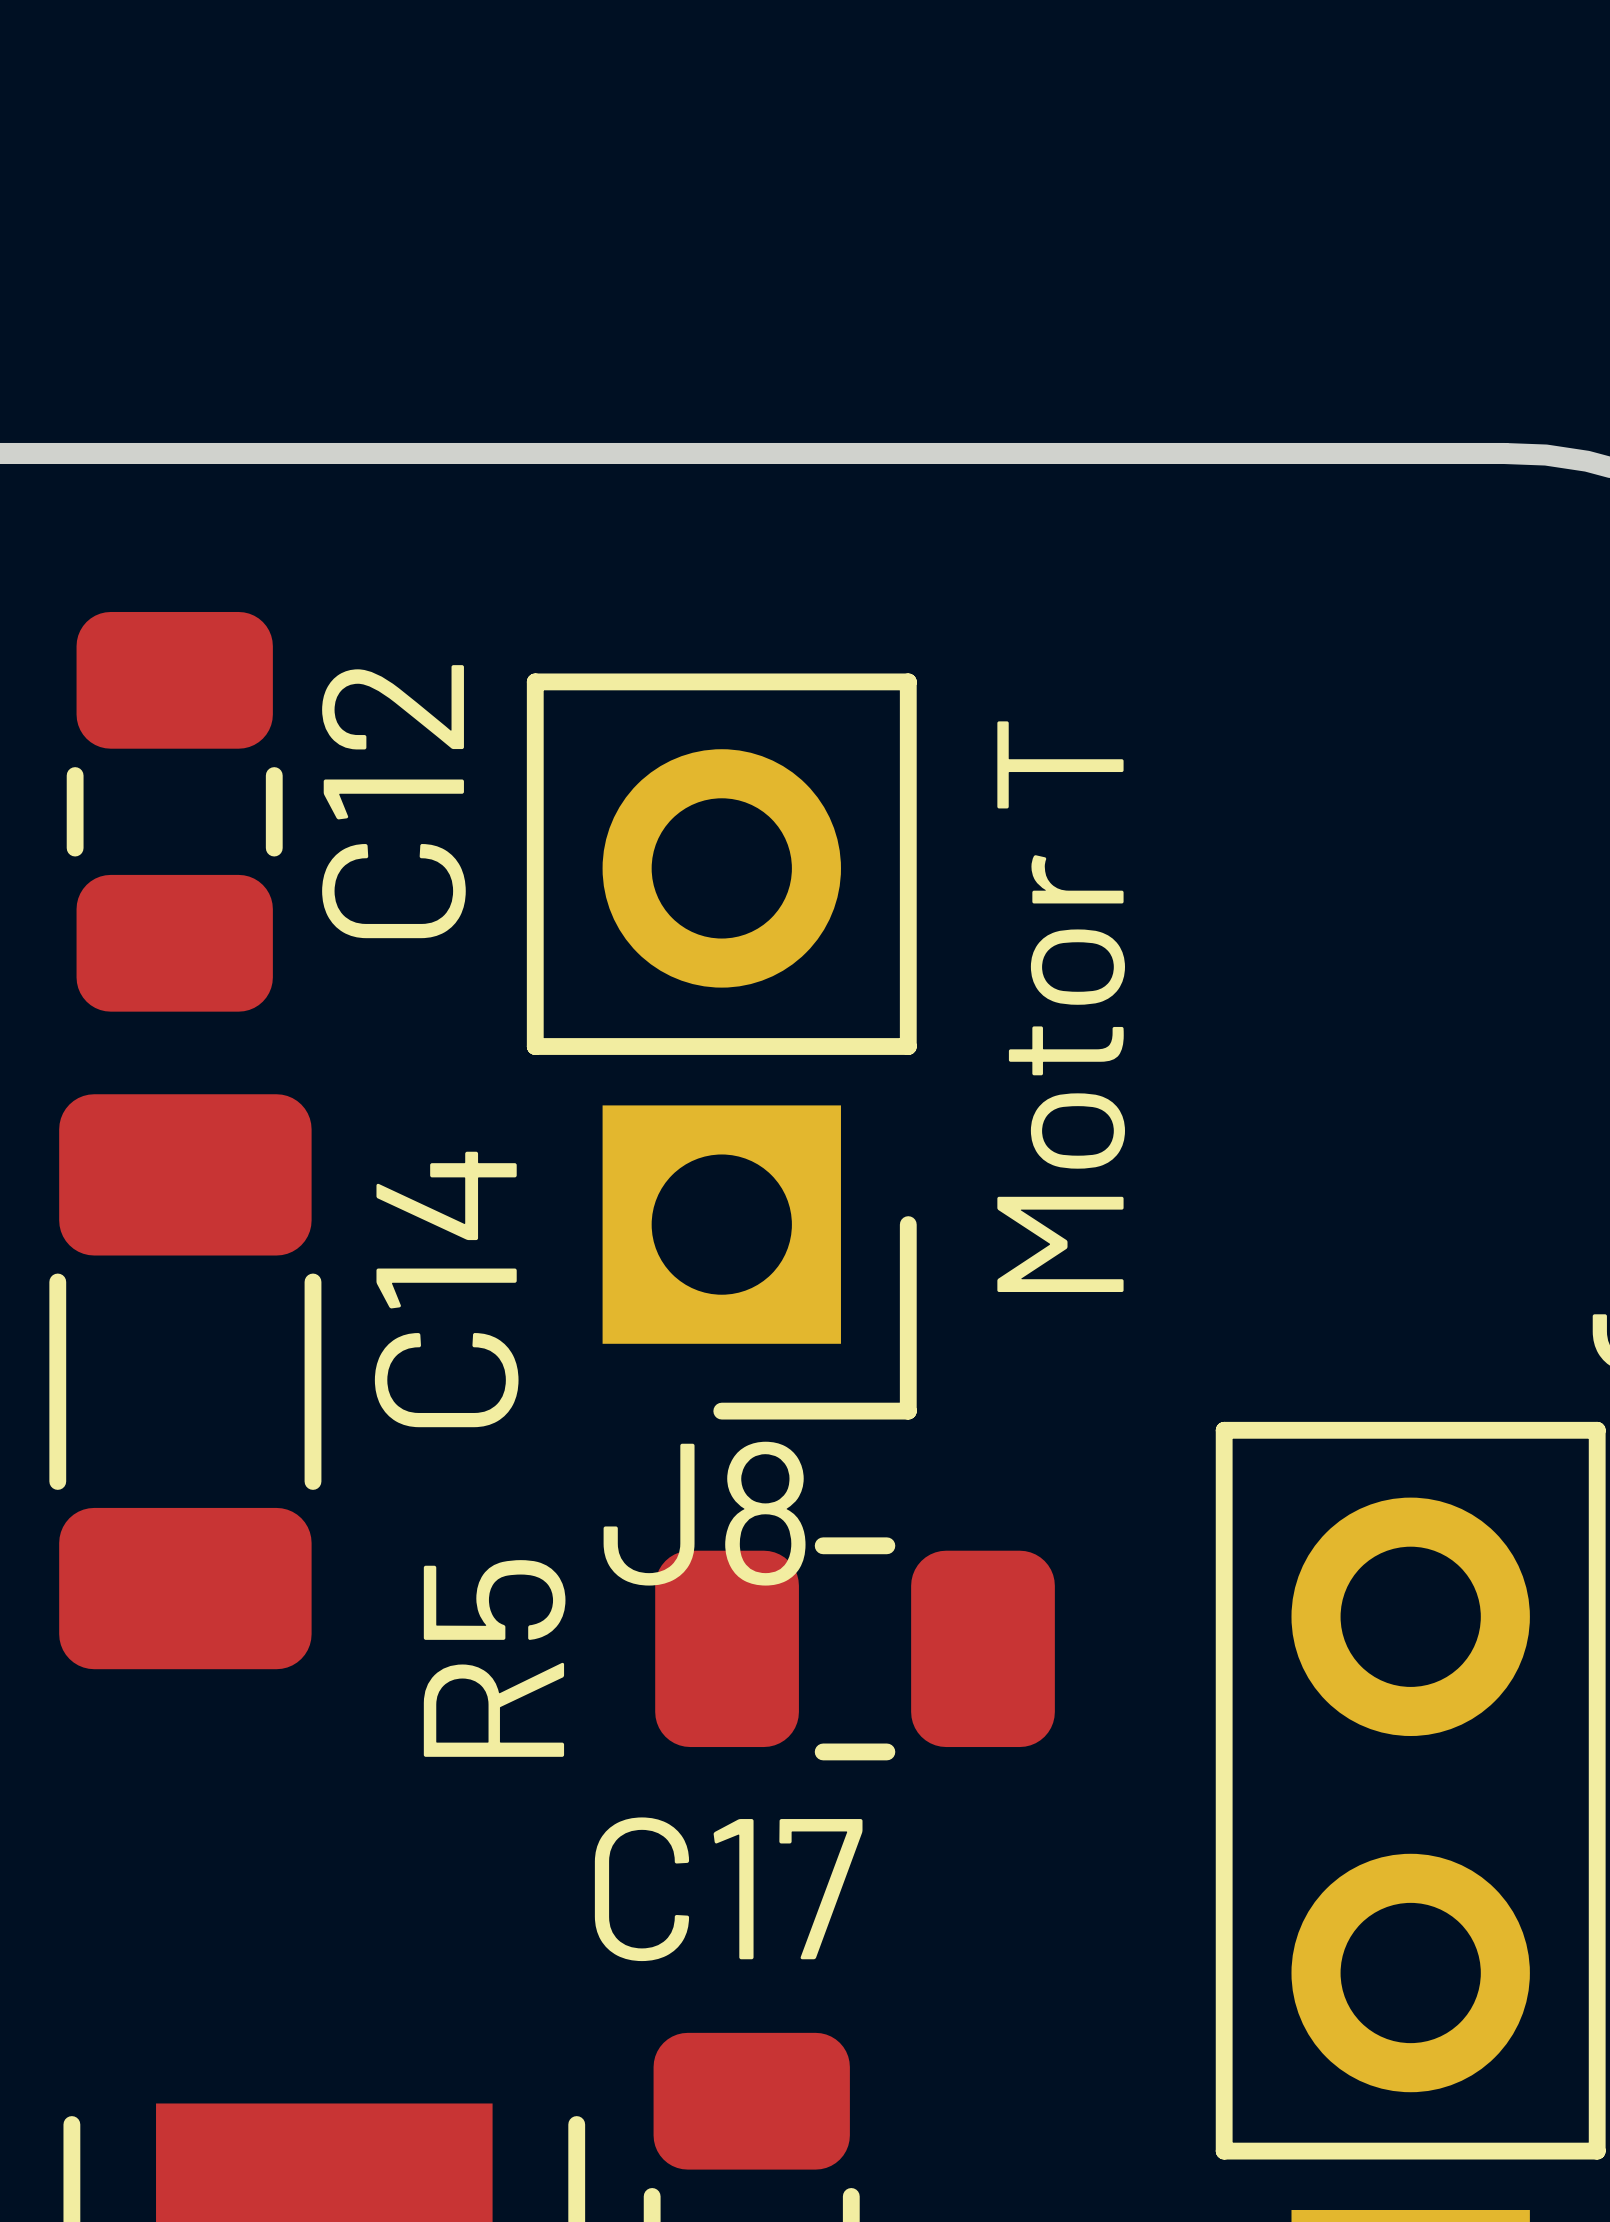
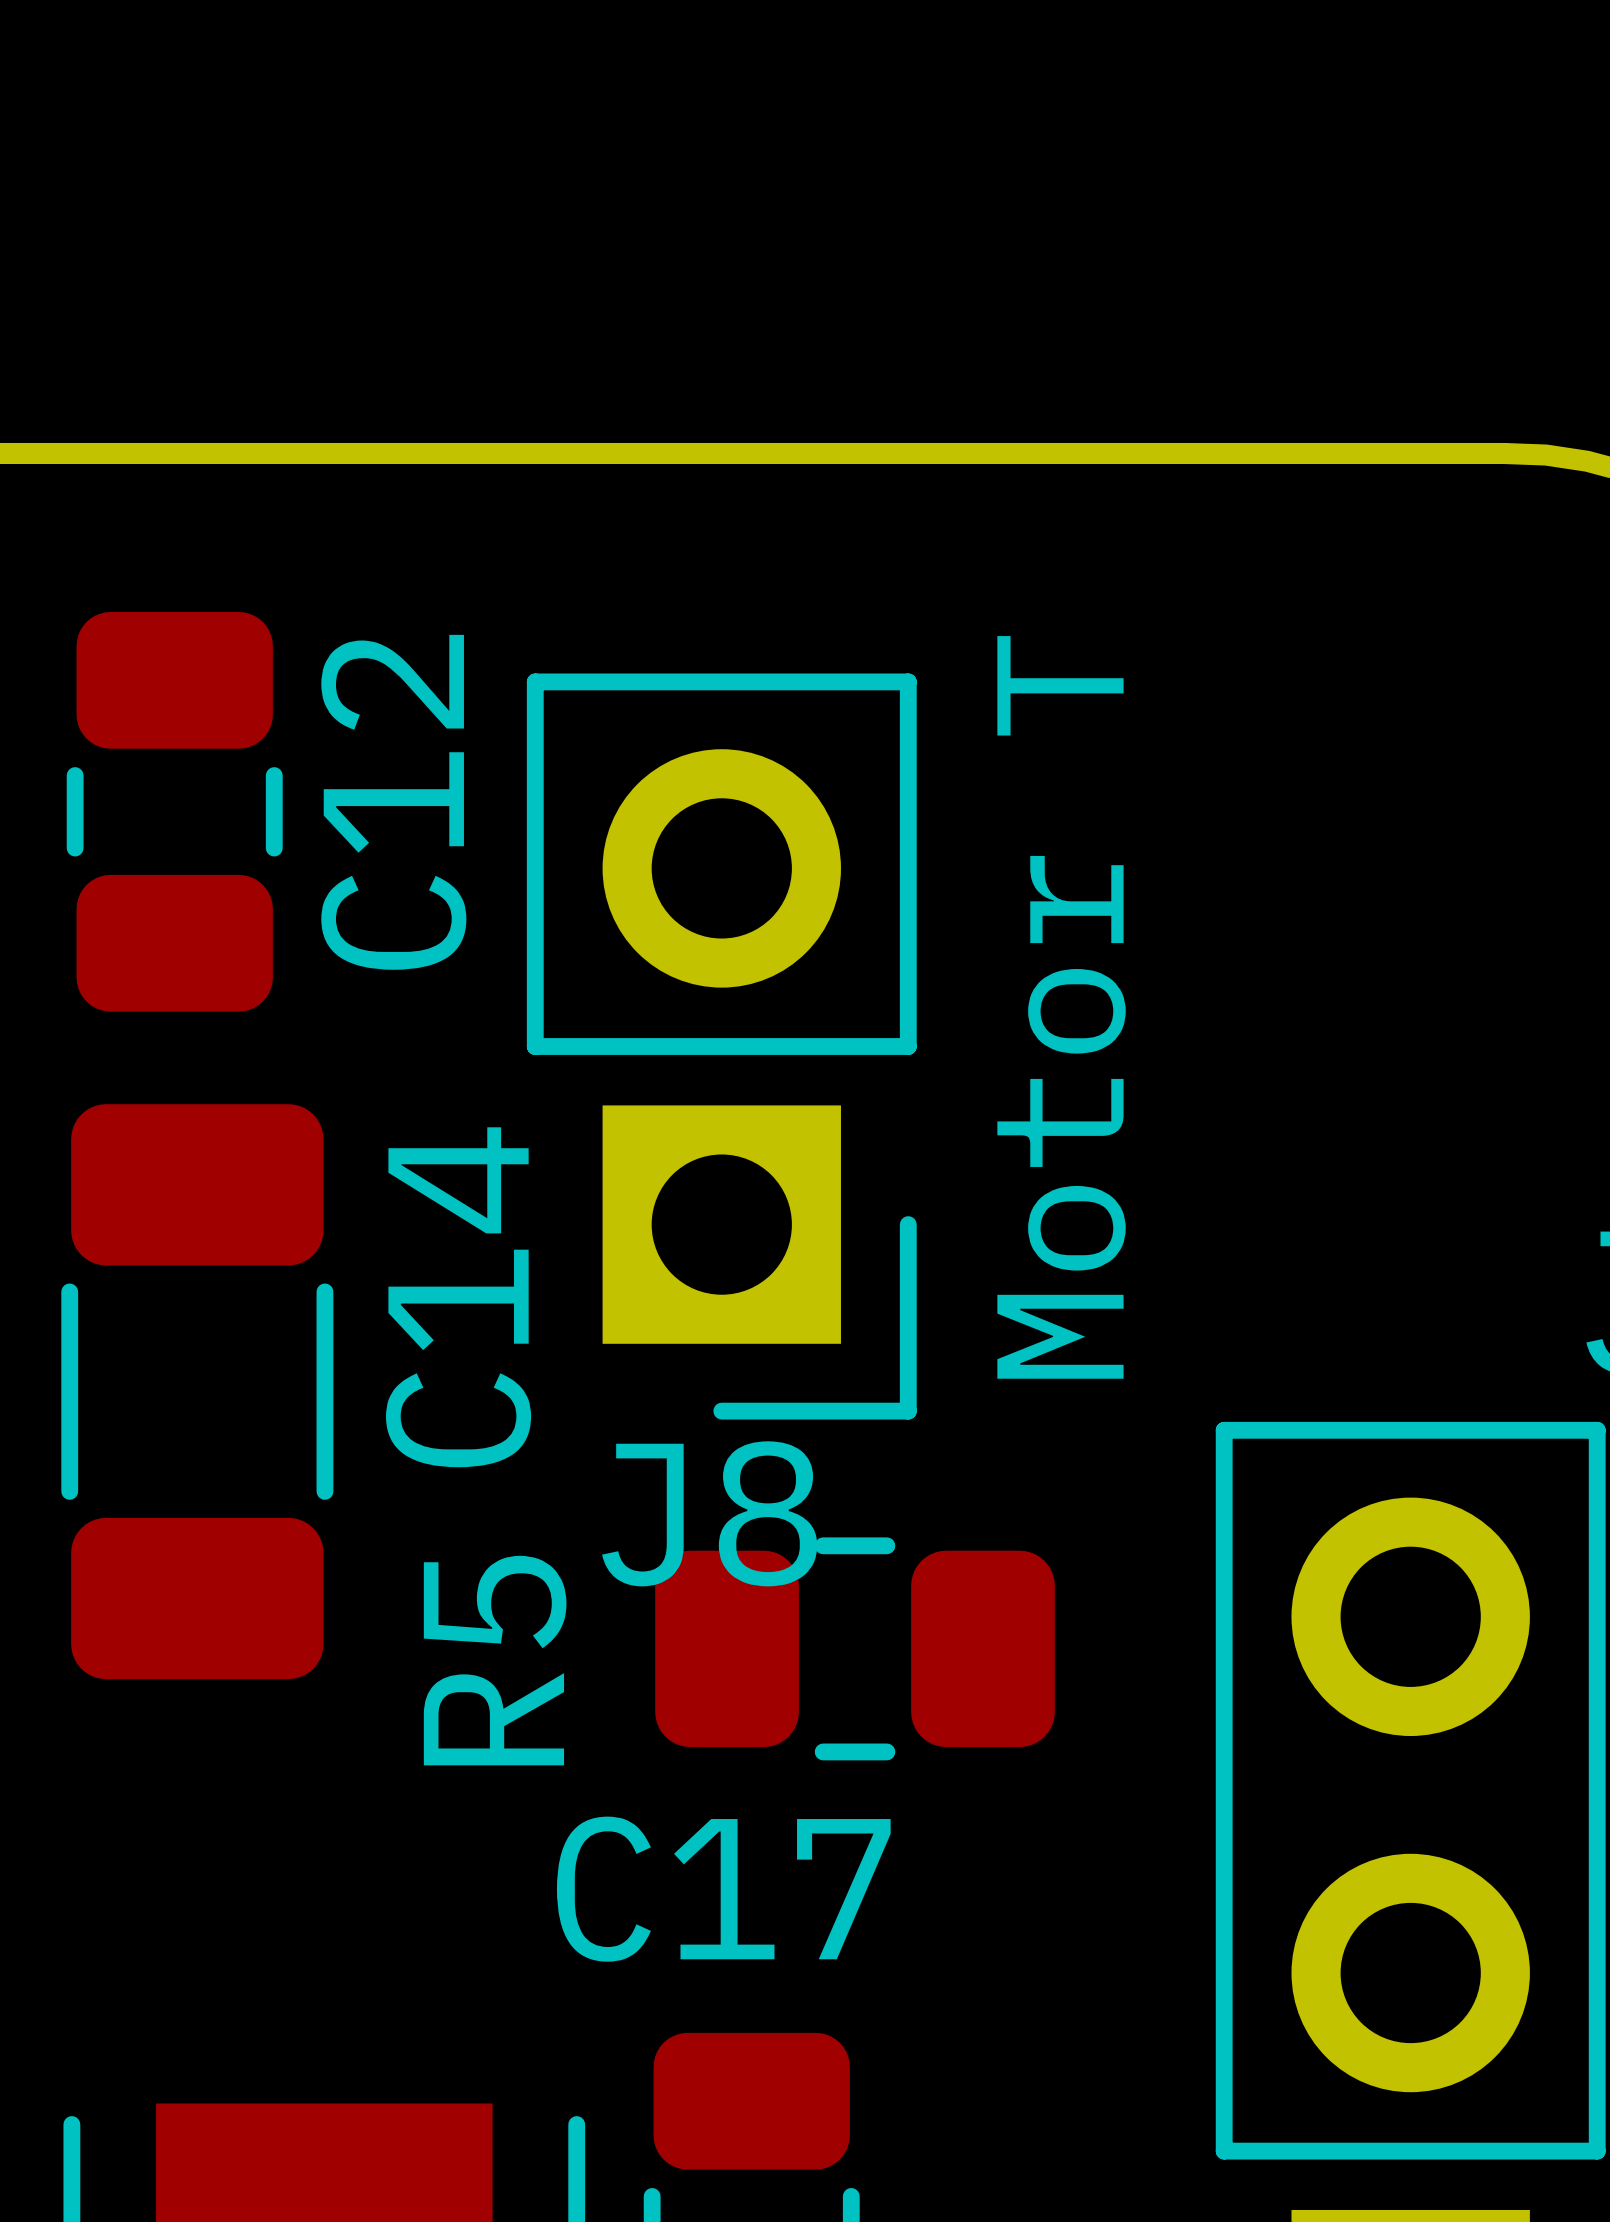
C14 position: (185, 1381) -> (197, 1391)

